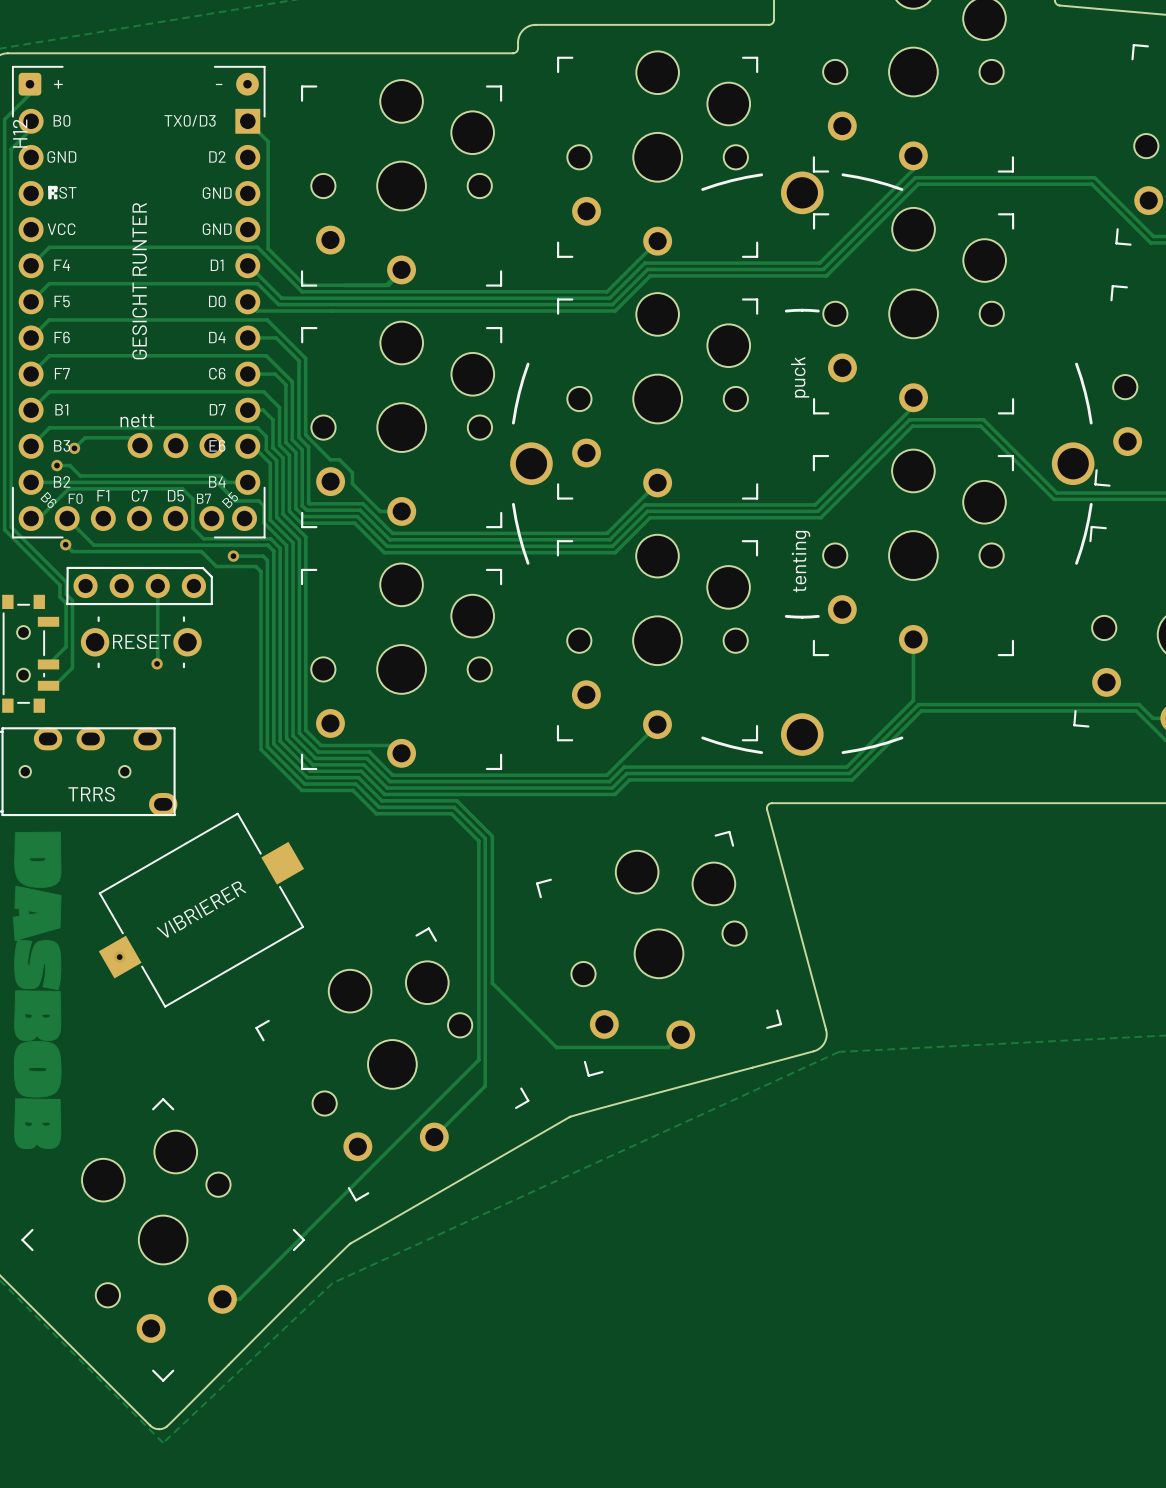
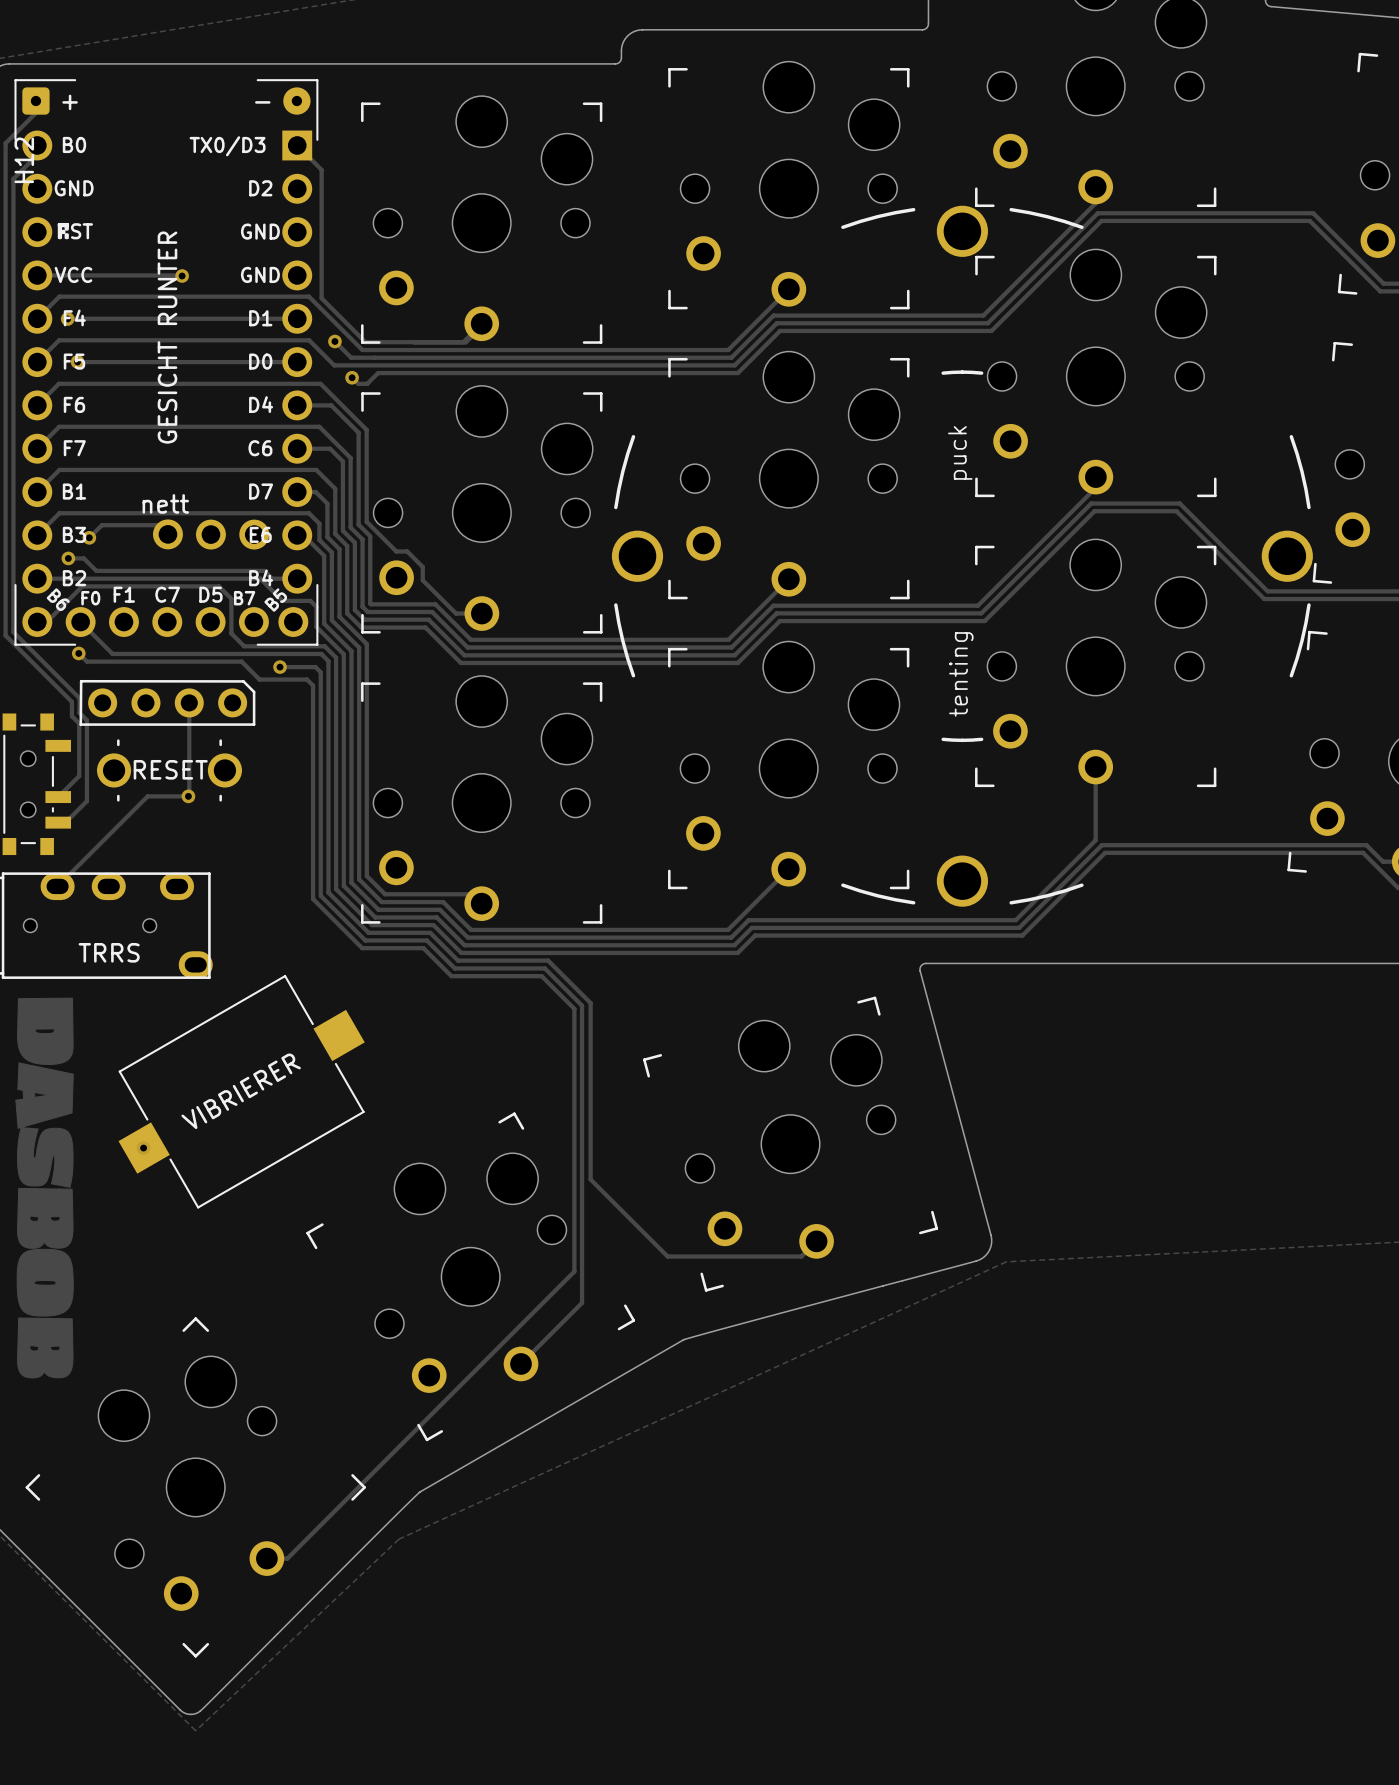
track: none -> (37, 275) (182, 276)
via: none -> (182, 276)
track: none -> (67, 318) (297, 318)
via: none -> (67, 318)
track: (249, 265) (281, 298) (292, 298) -> (334, 341) (351, 357)
via: none -> (334, 341)
track: none -> (77, 362) (297, 362)
via: none -> (77, 361)
track: (247, 301) (256, 311) (315, 311) -> (352, 377) (358, 383) (367, 383) (378, 373)
via: none -> (352, 377)
track: none -> (188, 796) (147, 796) (57, 886)

